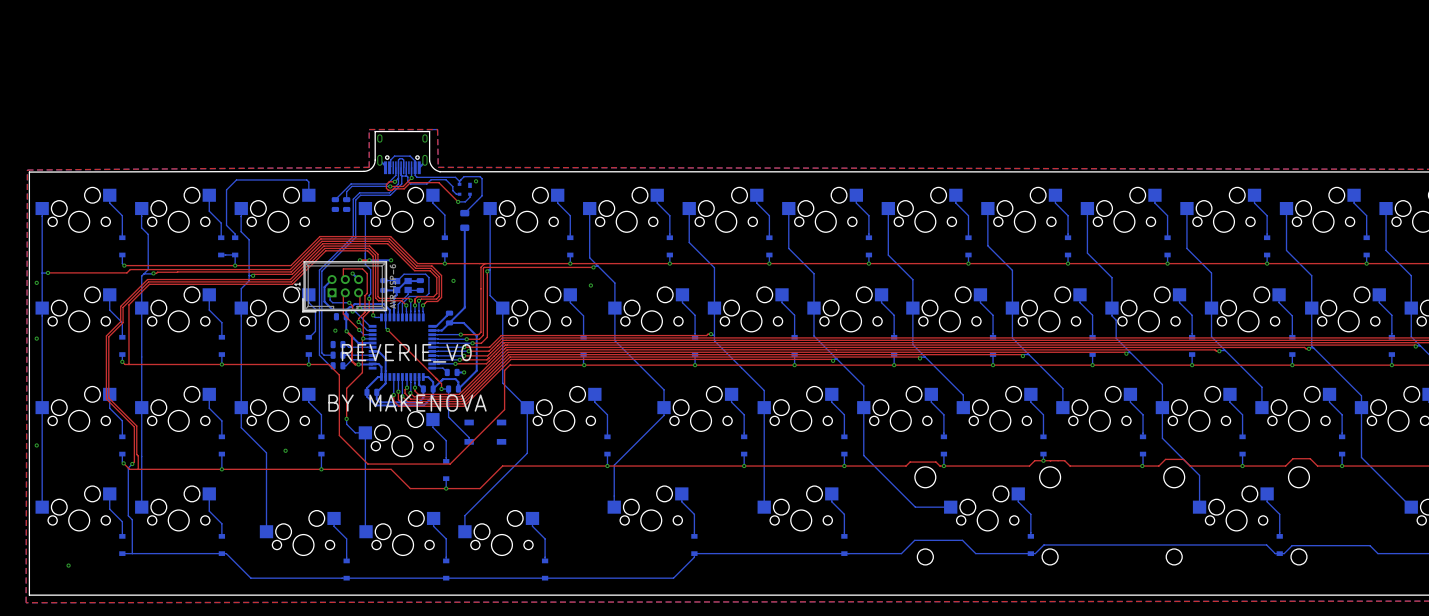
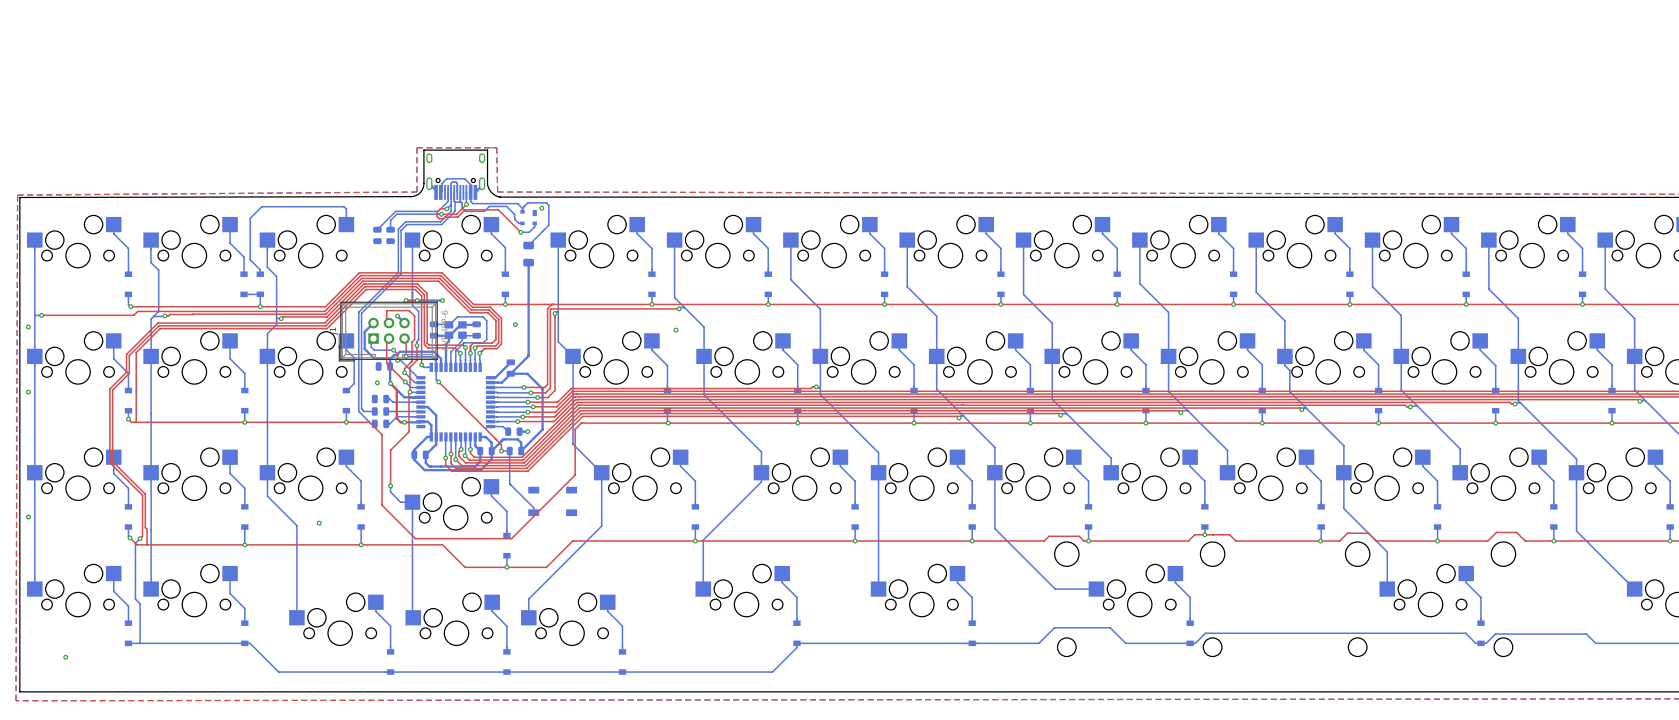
text: REVERIE_V0 (406, 353) -> none
text: BY MAKENOVA (407, 403) -> none

